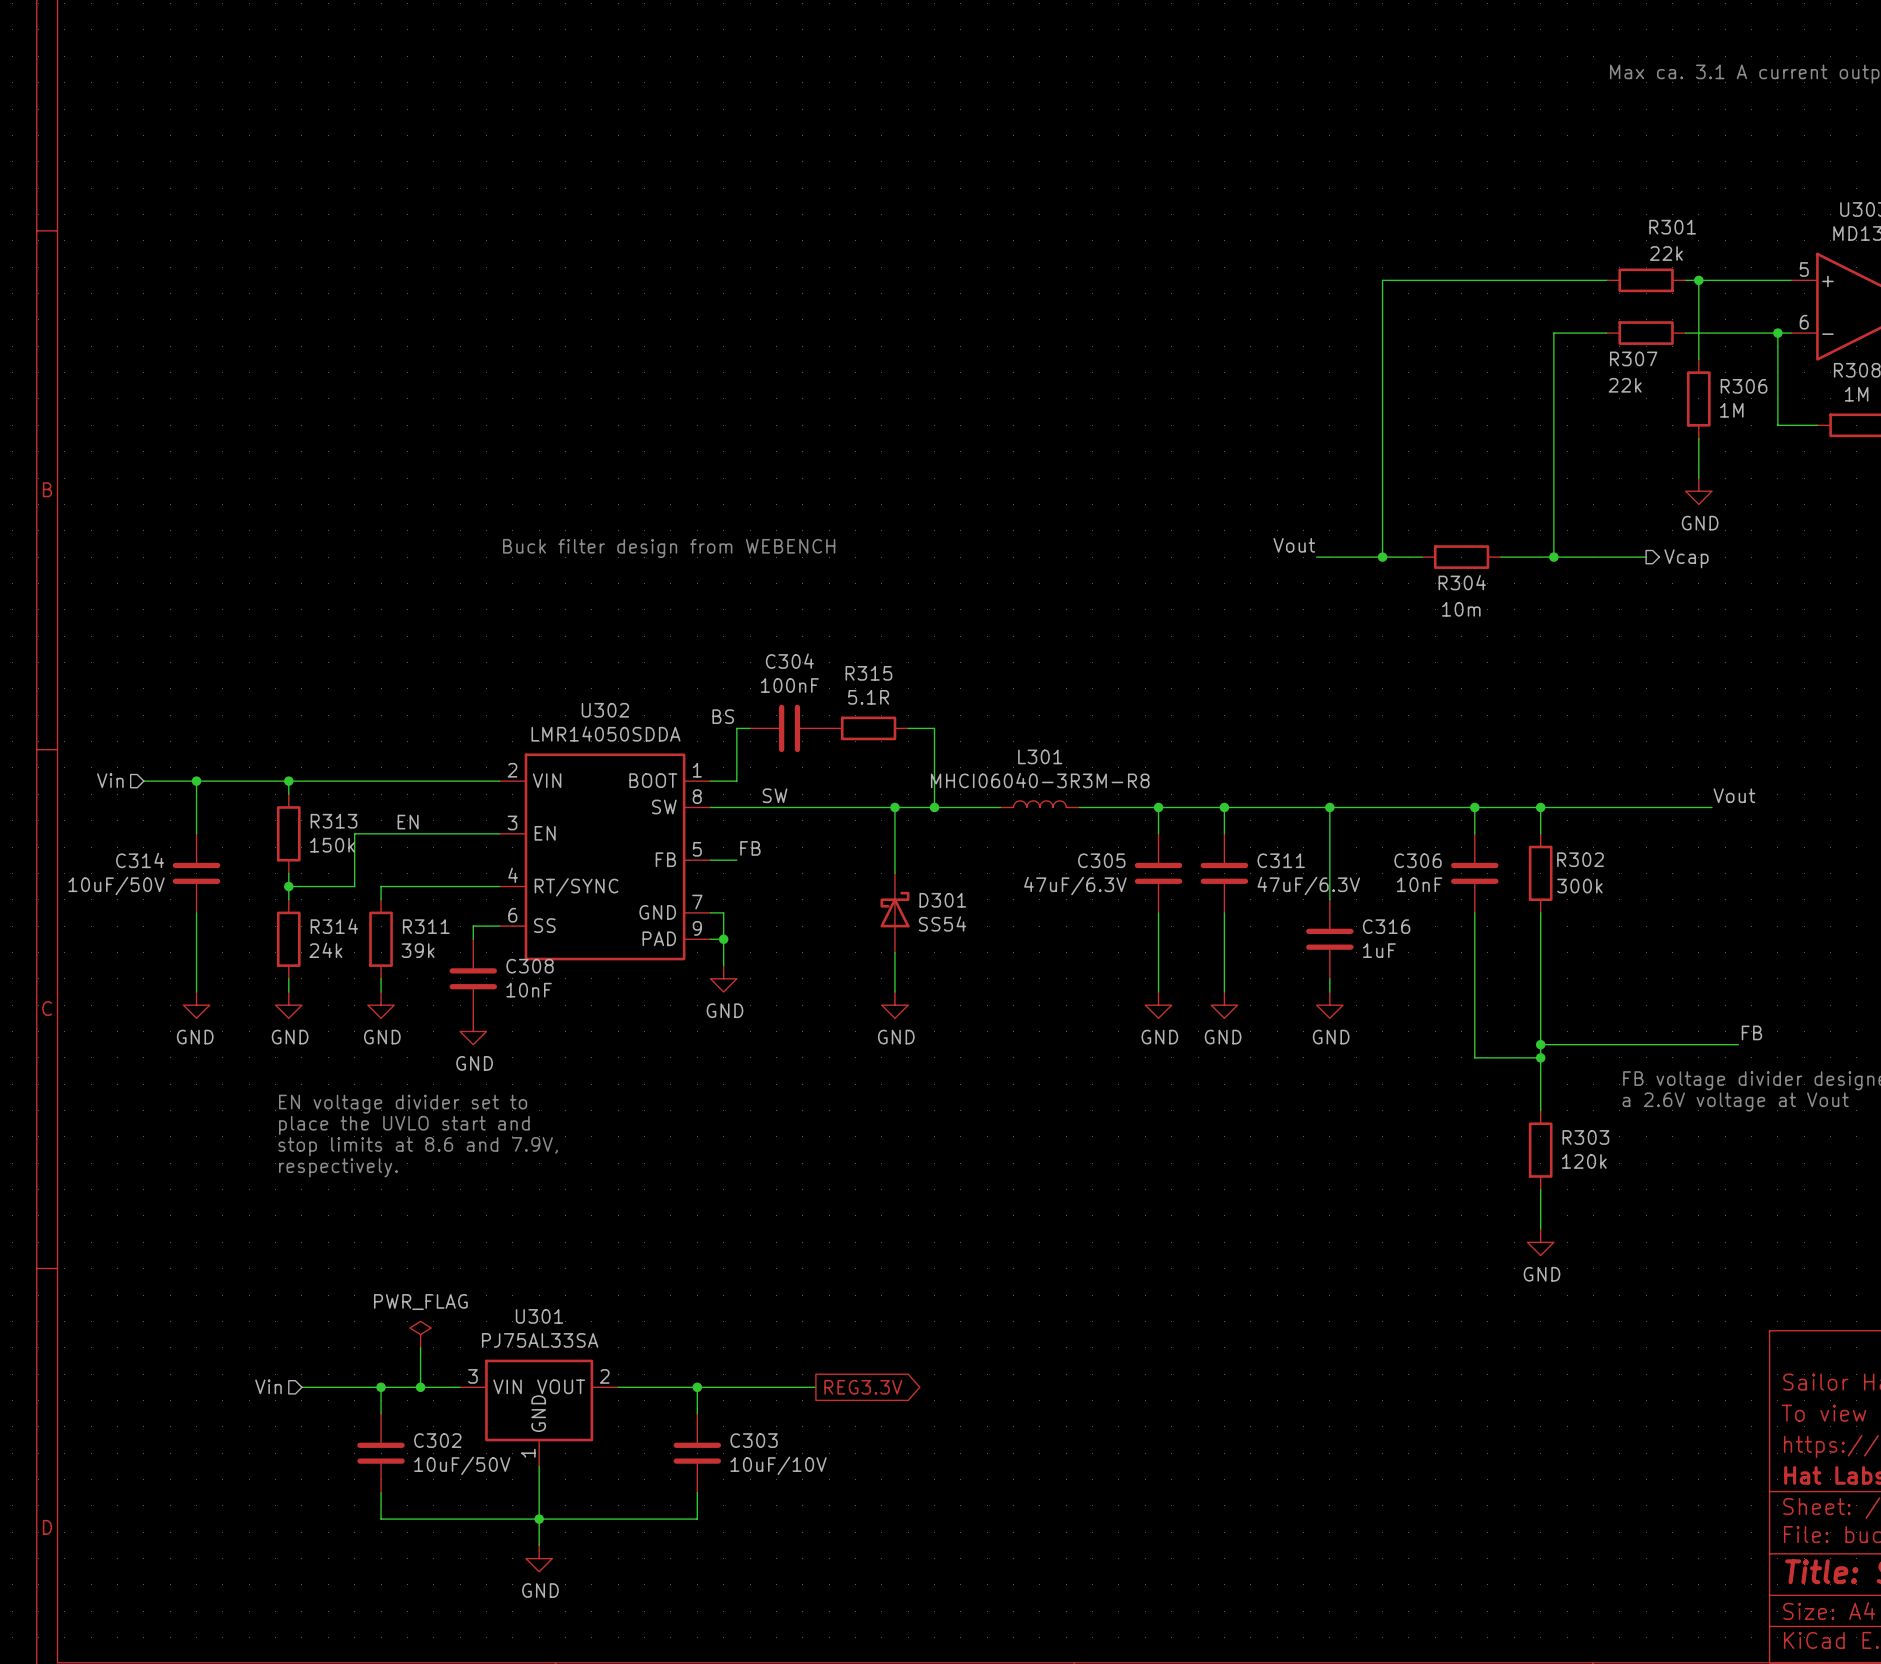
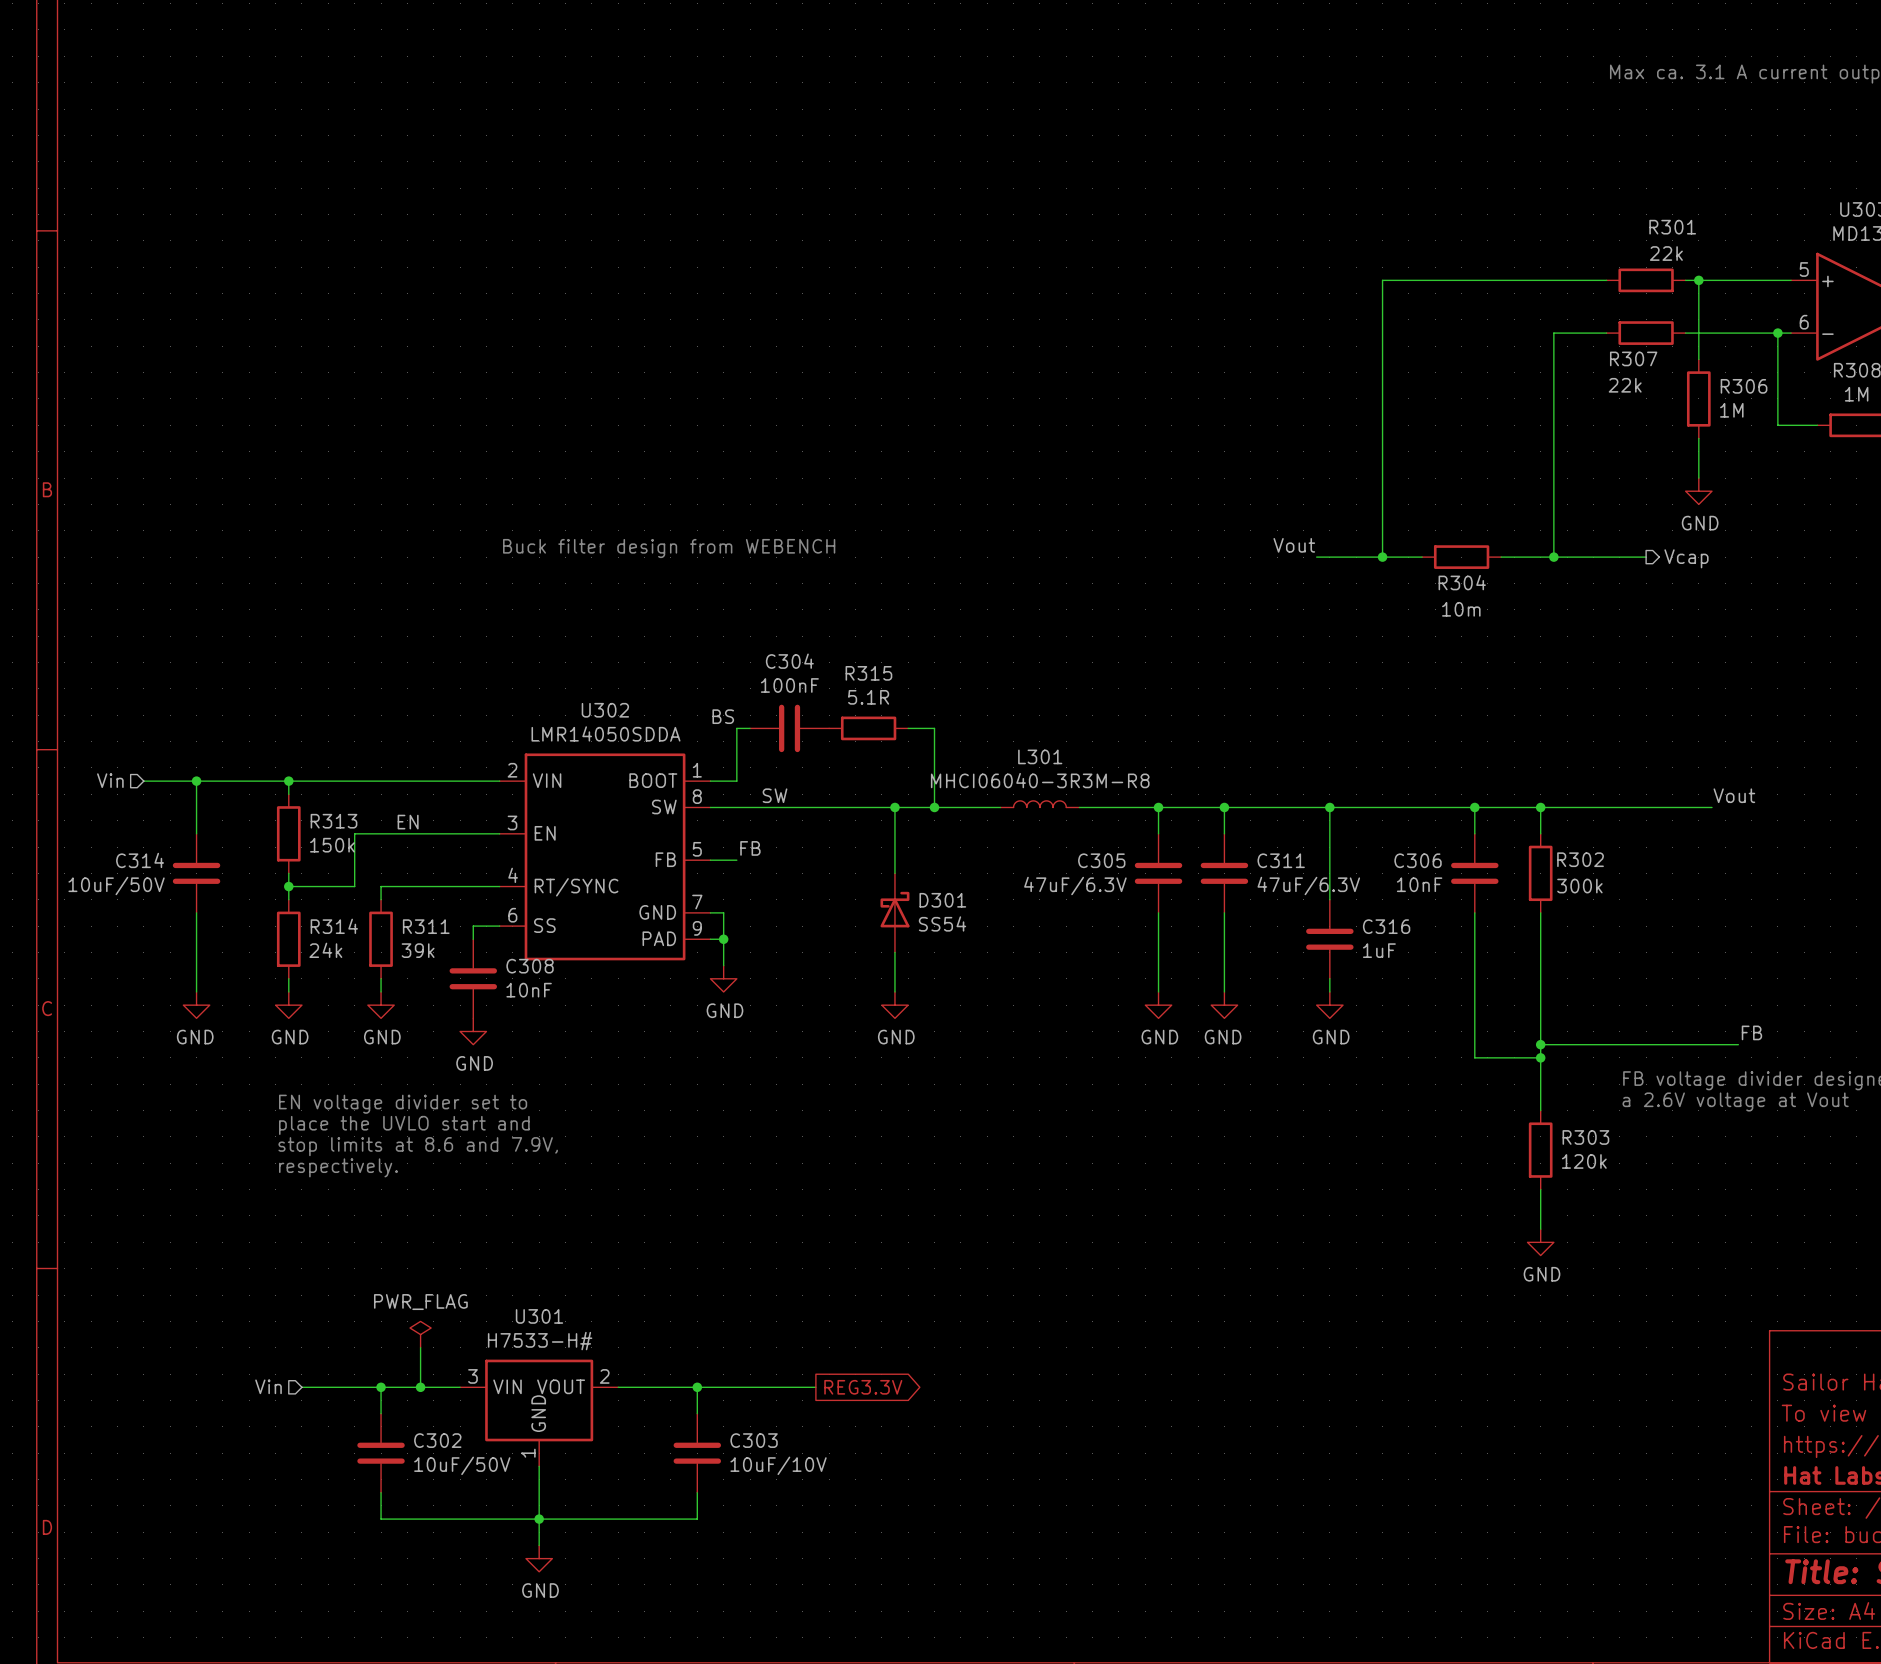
U301 value: PJ75AL33SA (540, 1340) -> H7533-H# (540, 1341)

